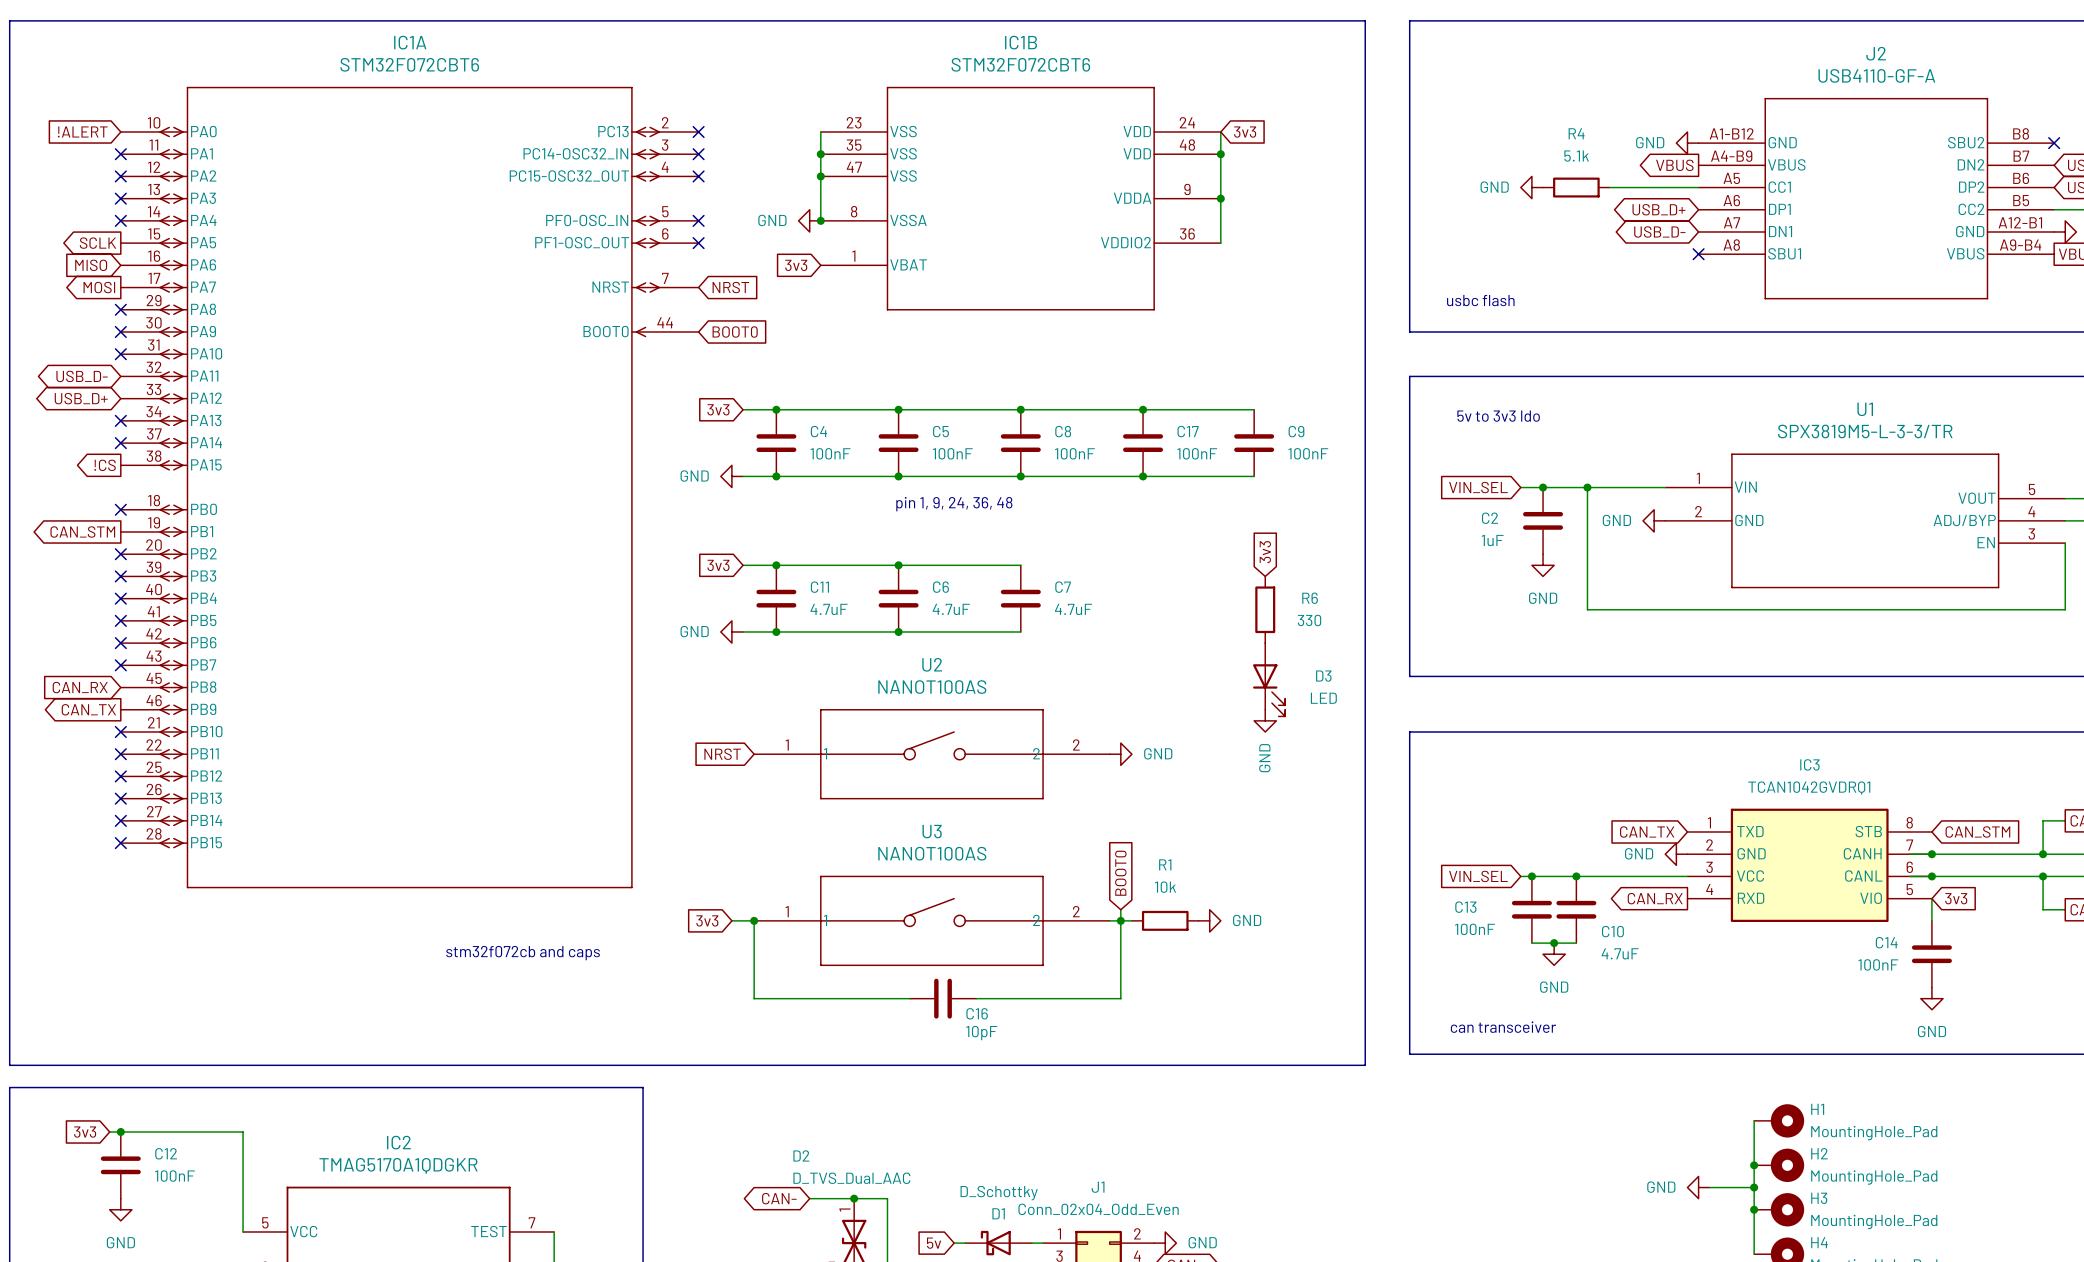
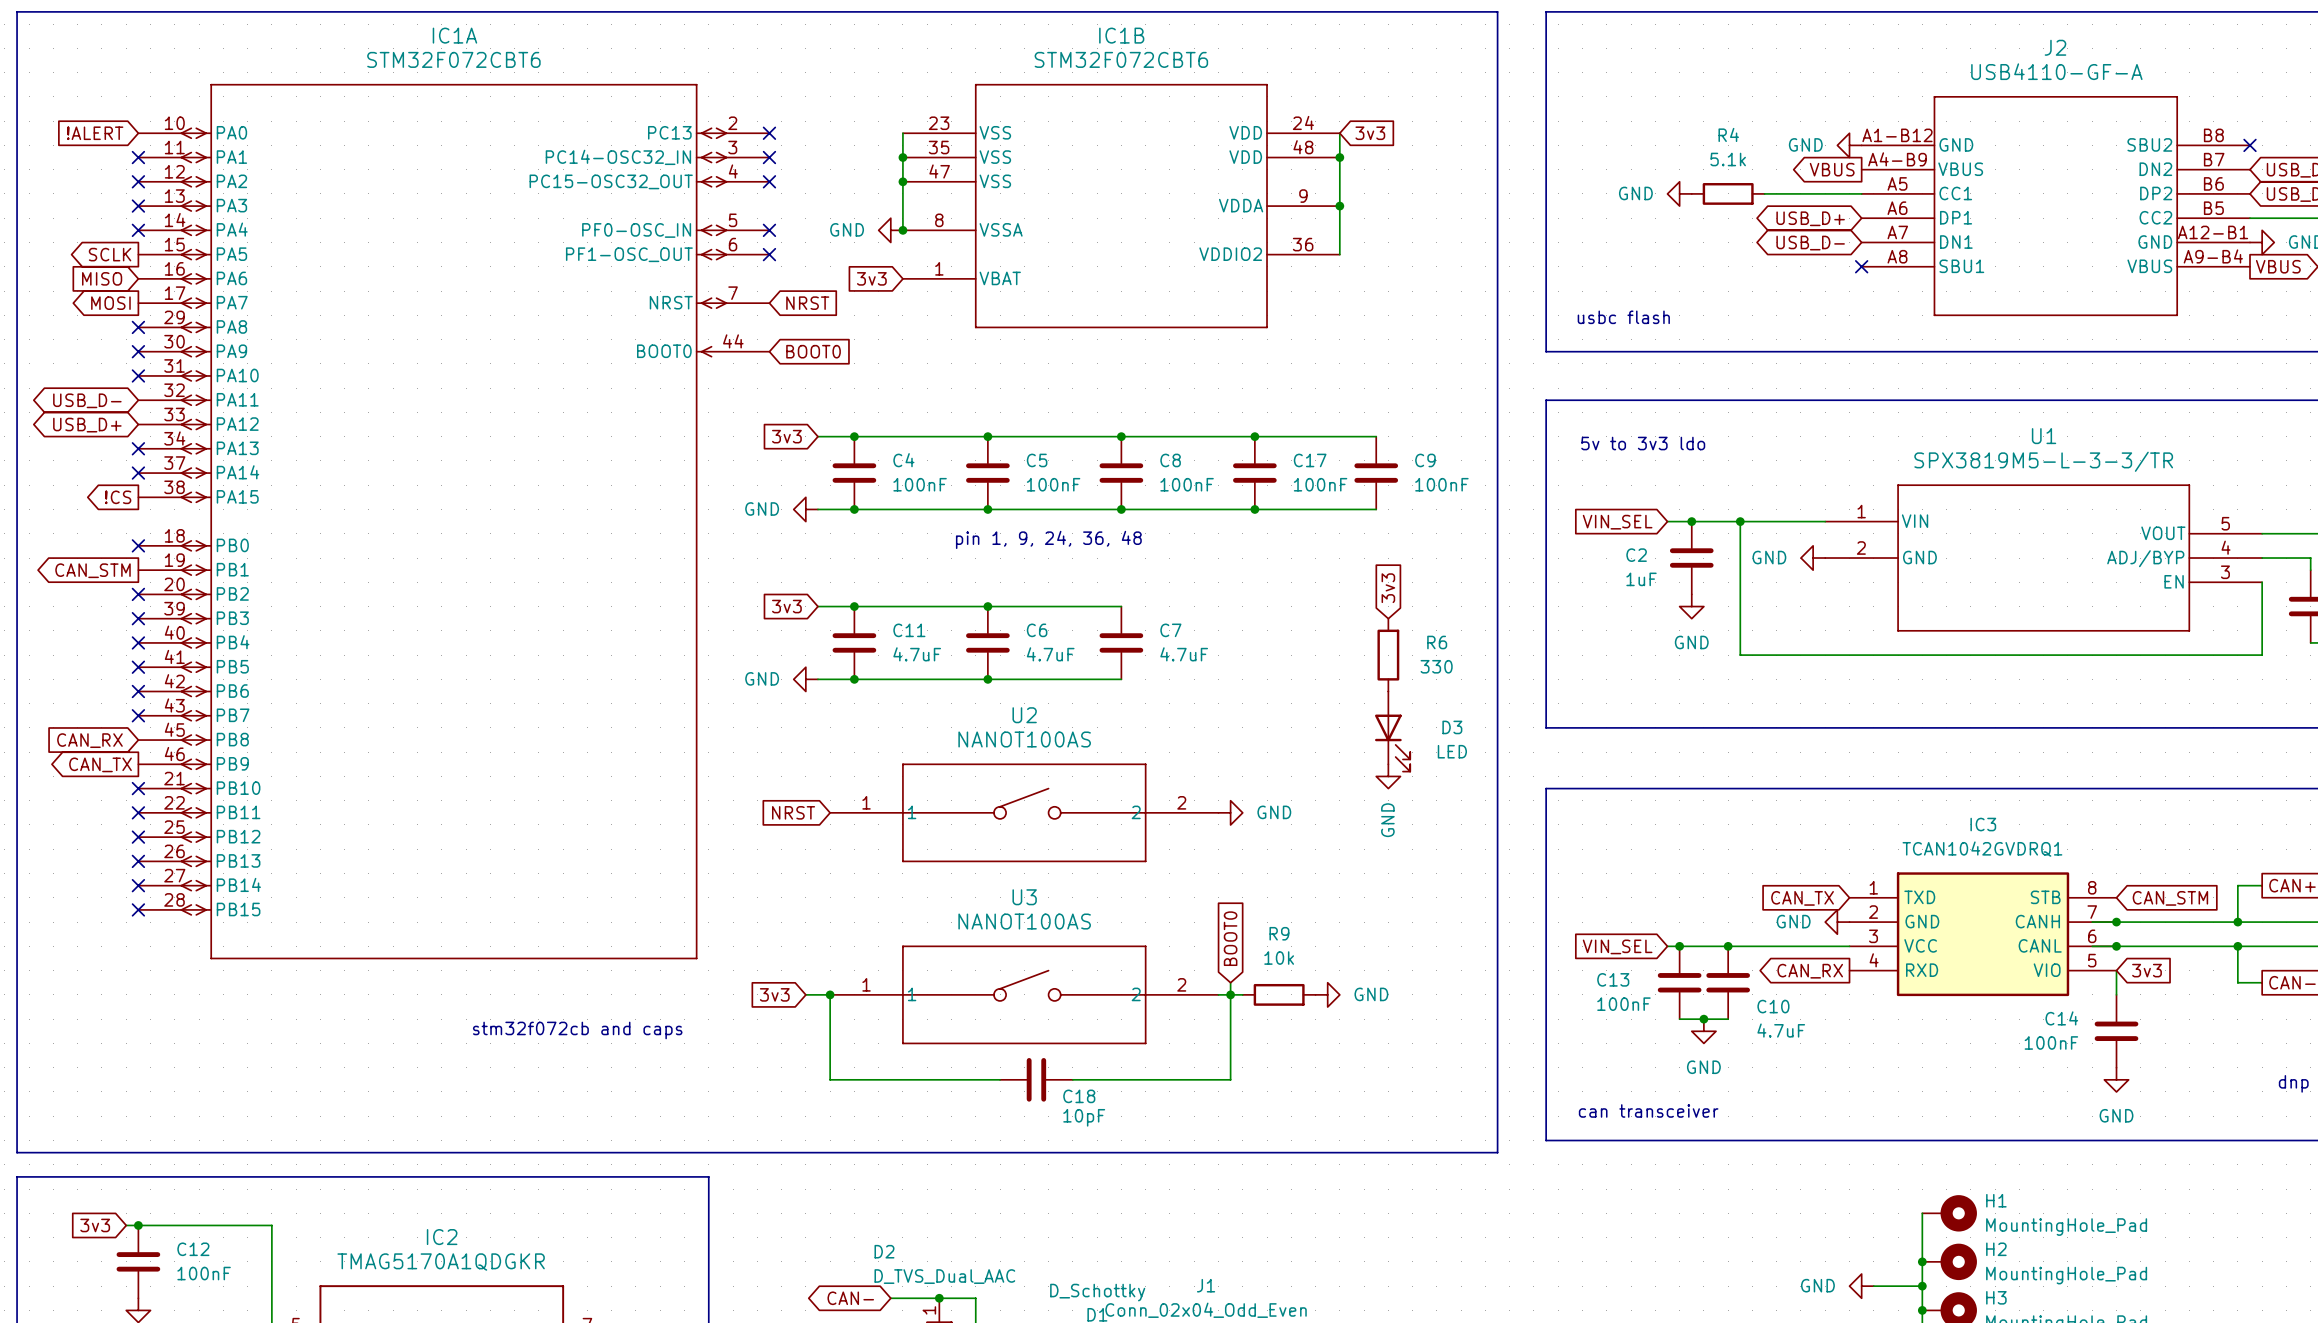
R1 name: R1 (1165, 864) -> R9 (1279, 933)
C16 name: C16 (977, 1013) -> C18 (1079, 1096)

